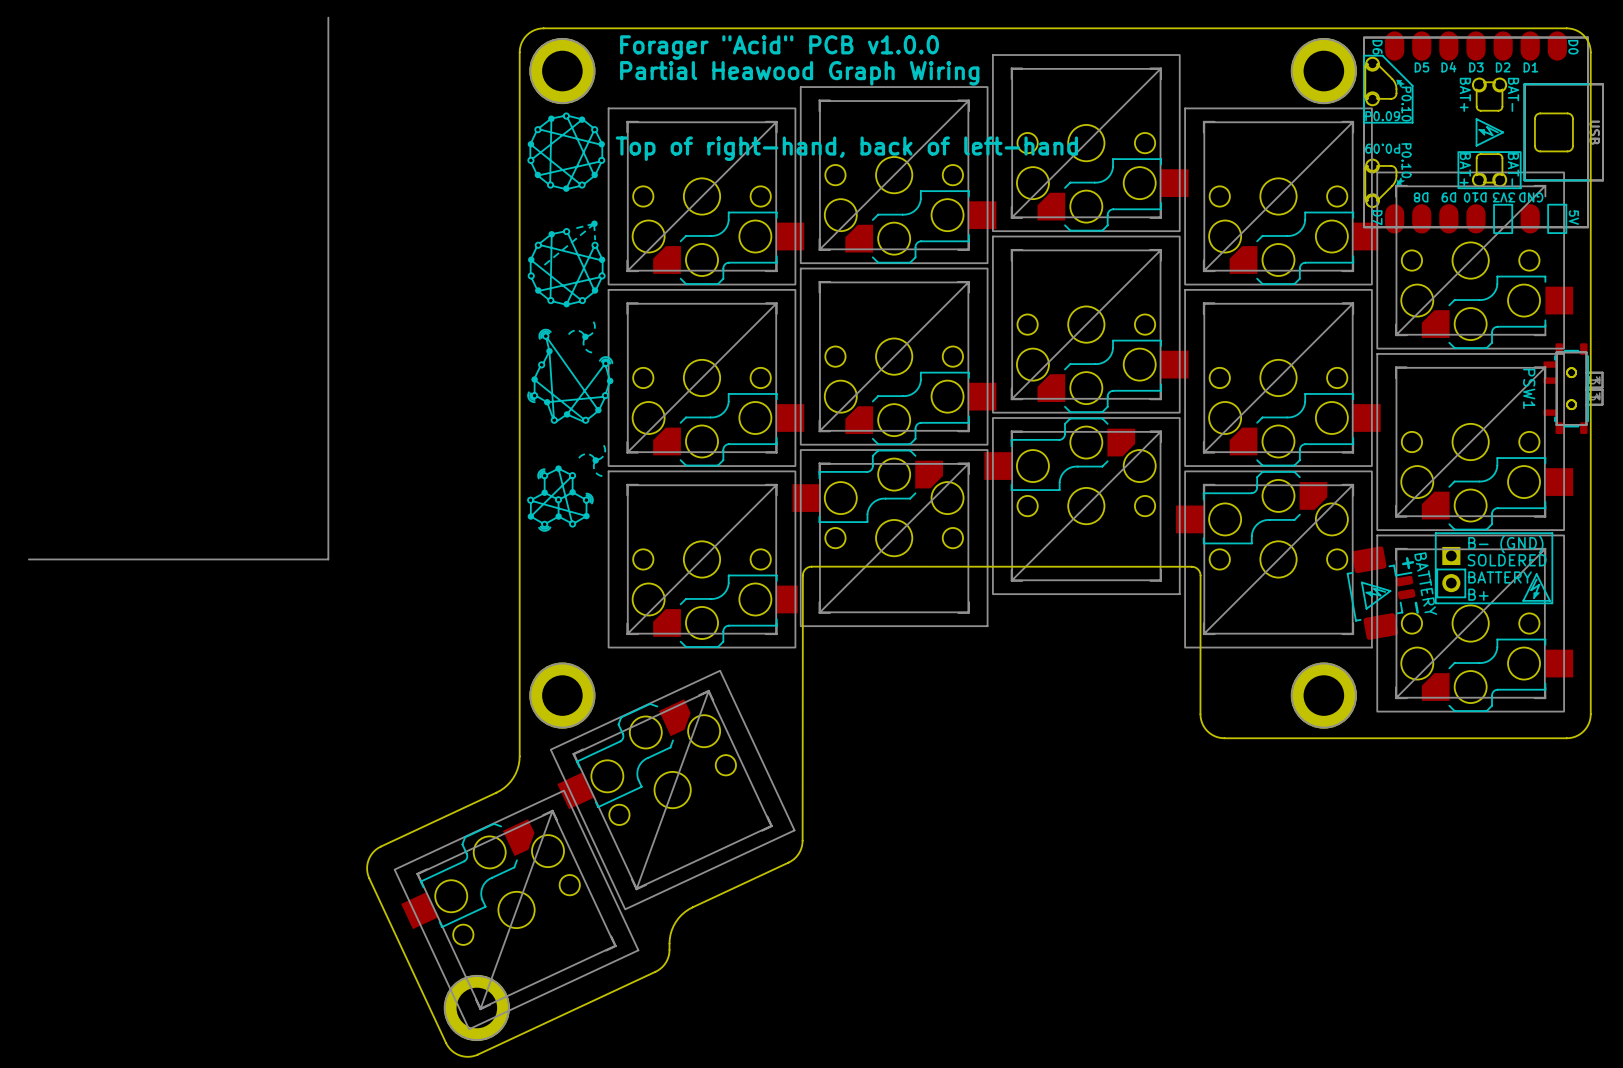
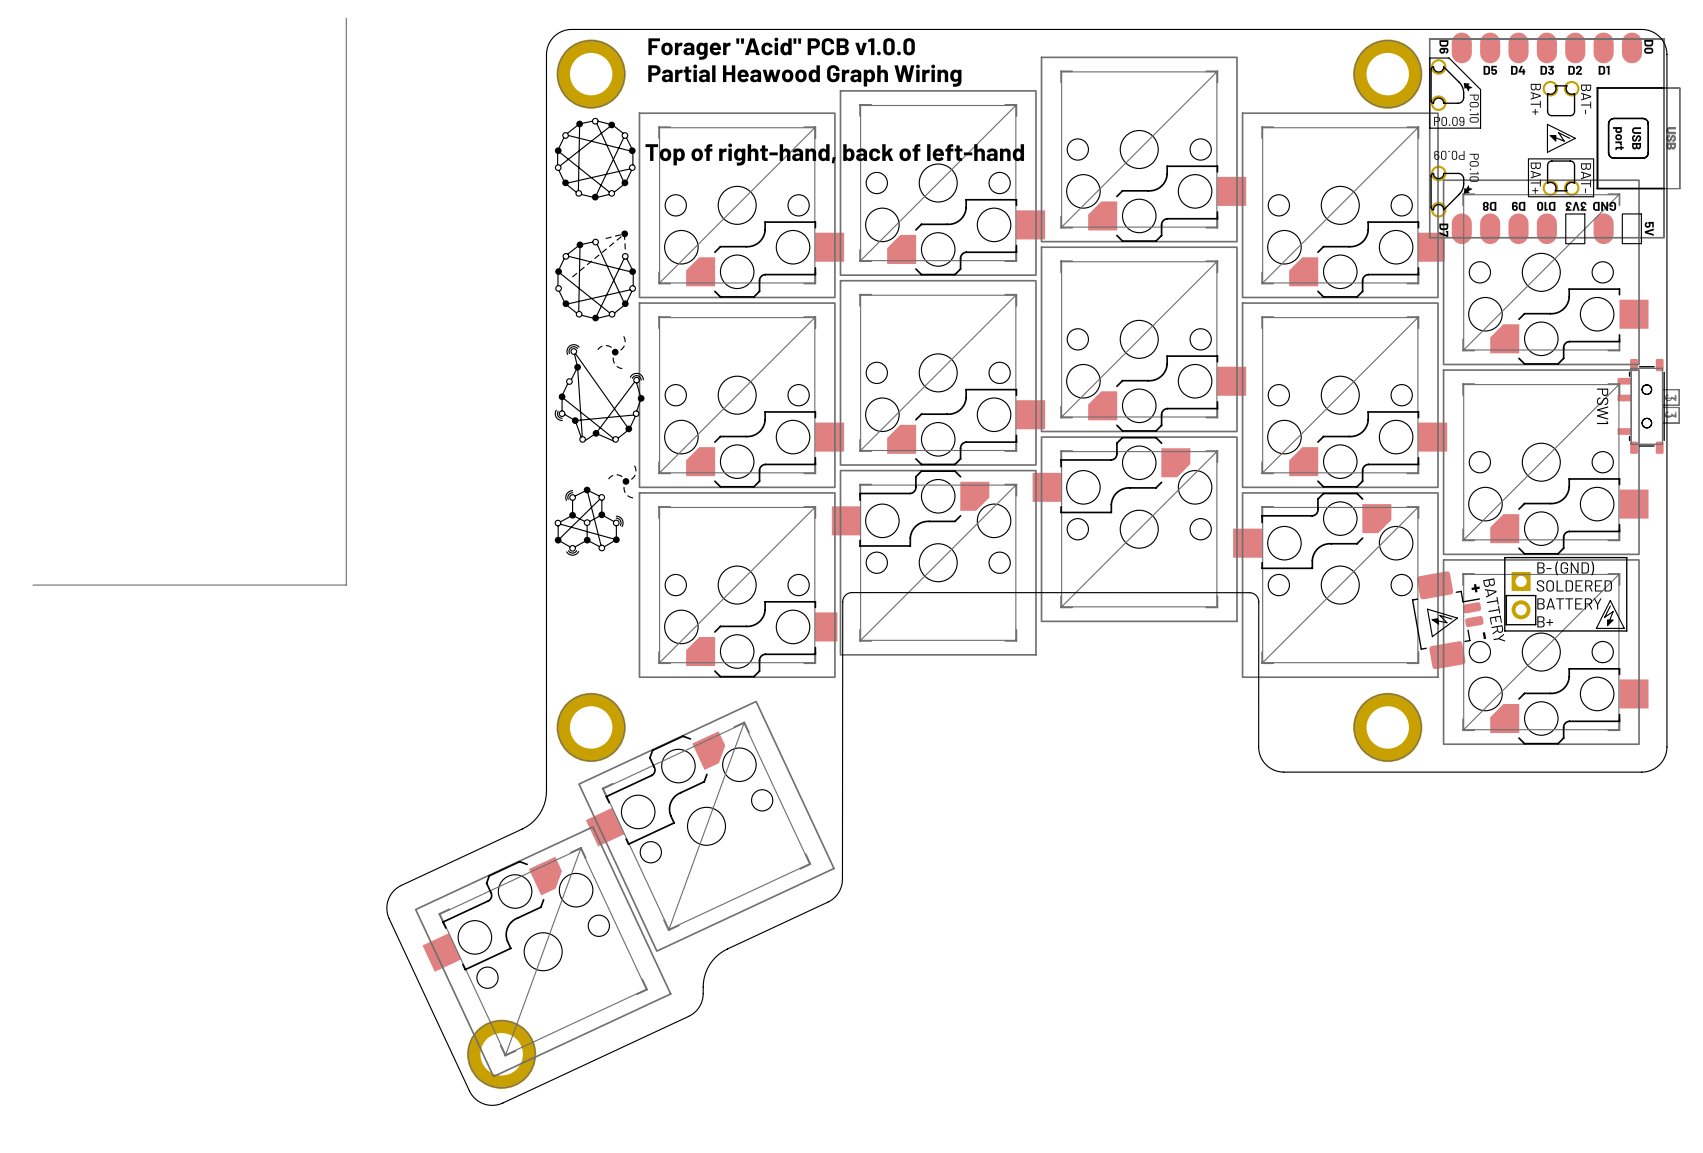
part: (1483, 132) -> none
part: none -> (1554, 138)
part: none -> (1554, 138)

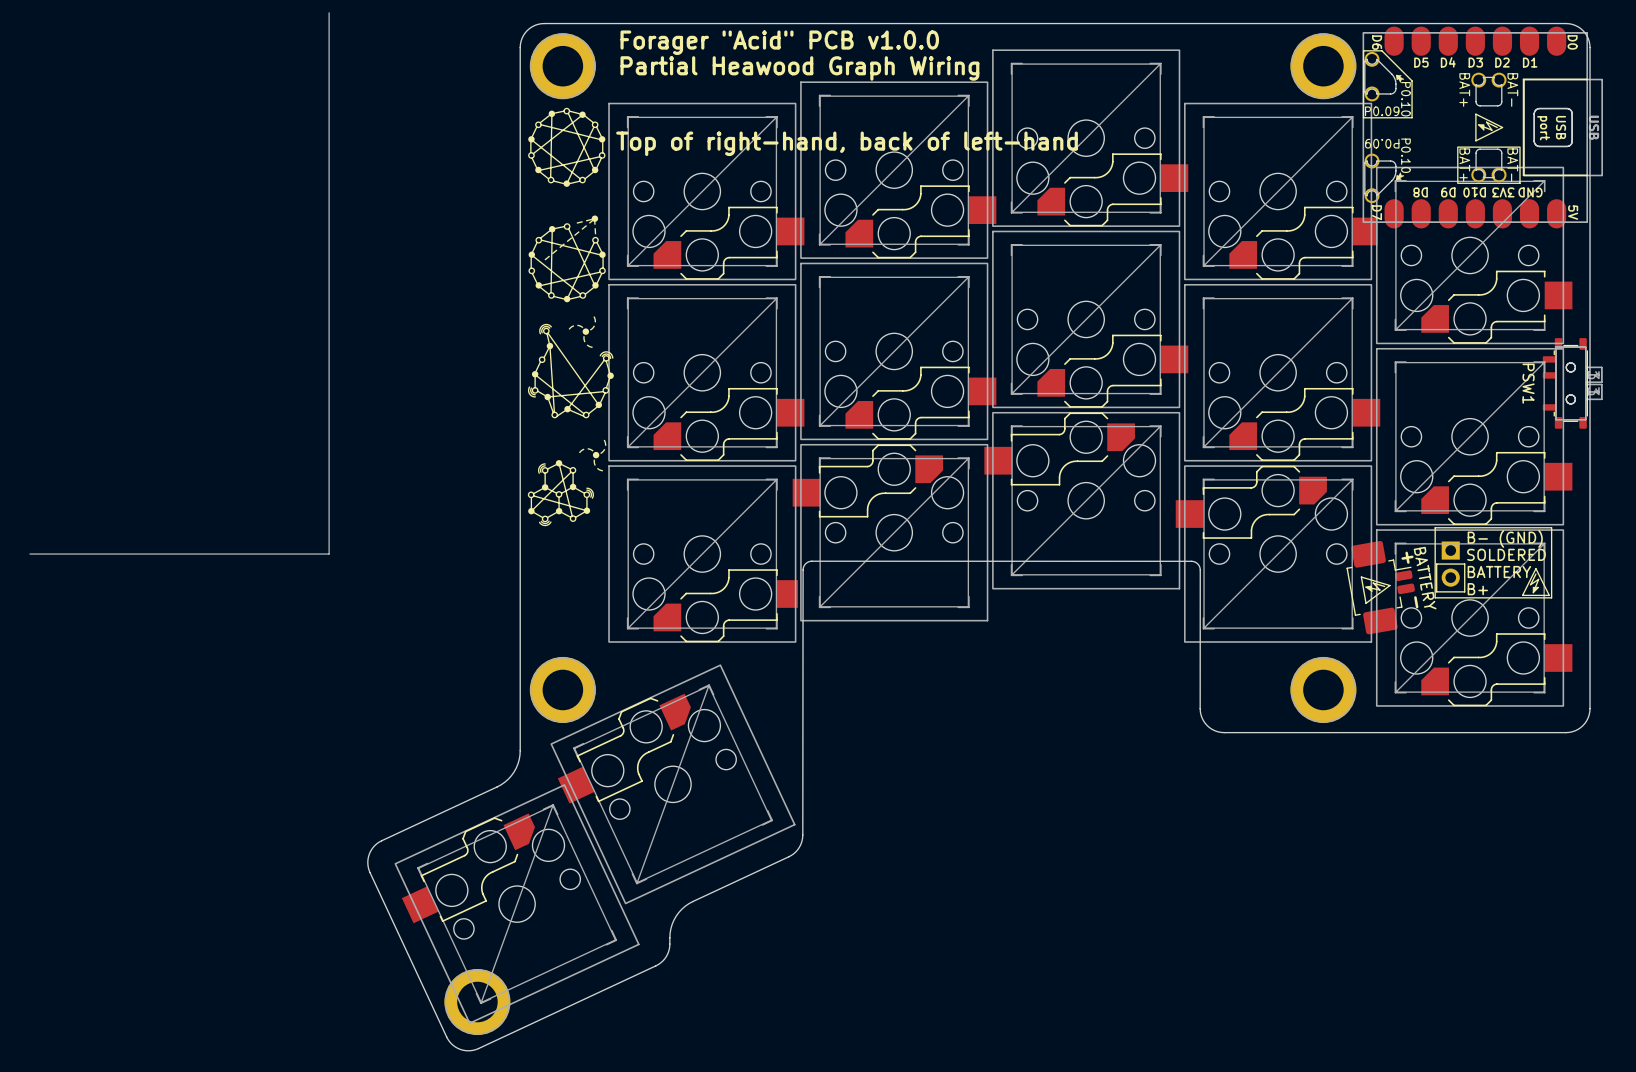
part: (1554, 138) -> none
part: (1554, 138) -> none
part: none -> (1482, 127)
part: none -> (1482, 127)

